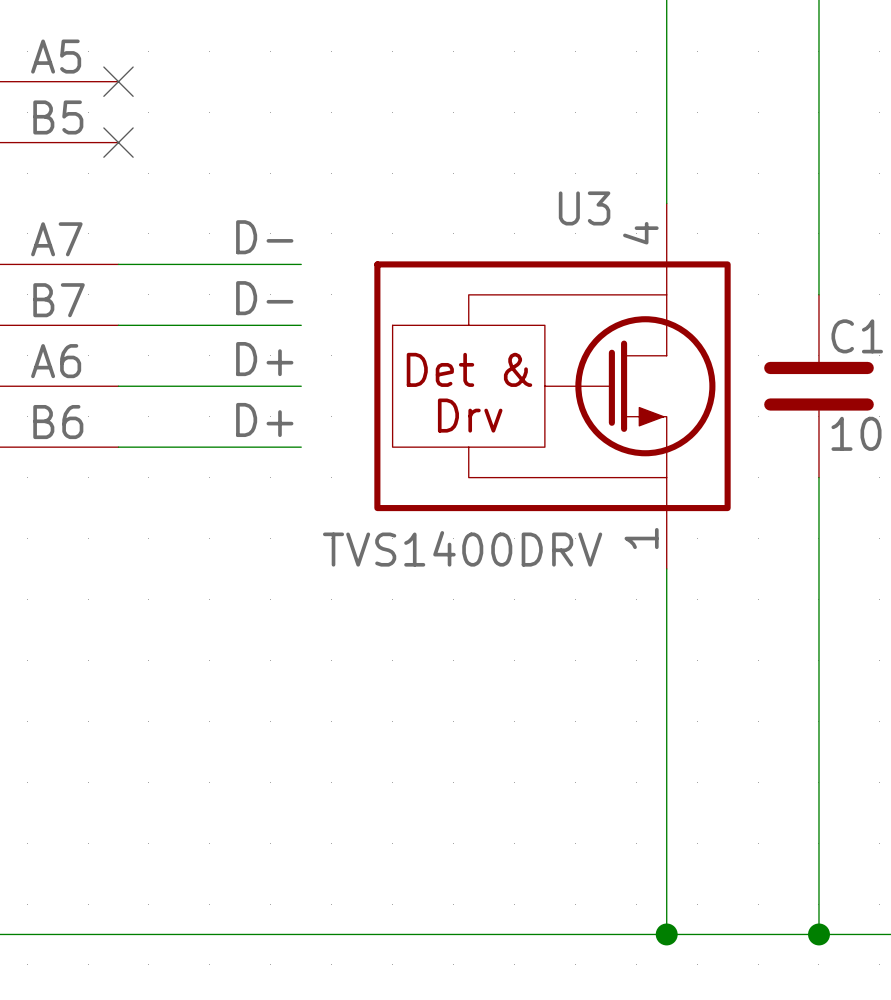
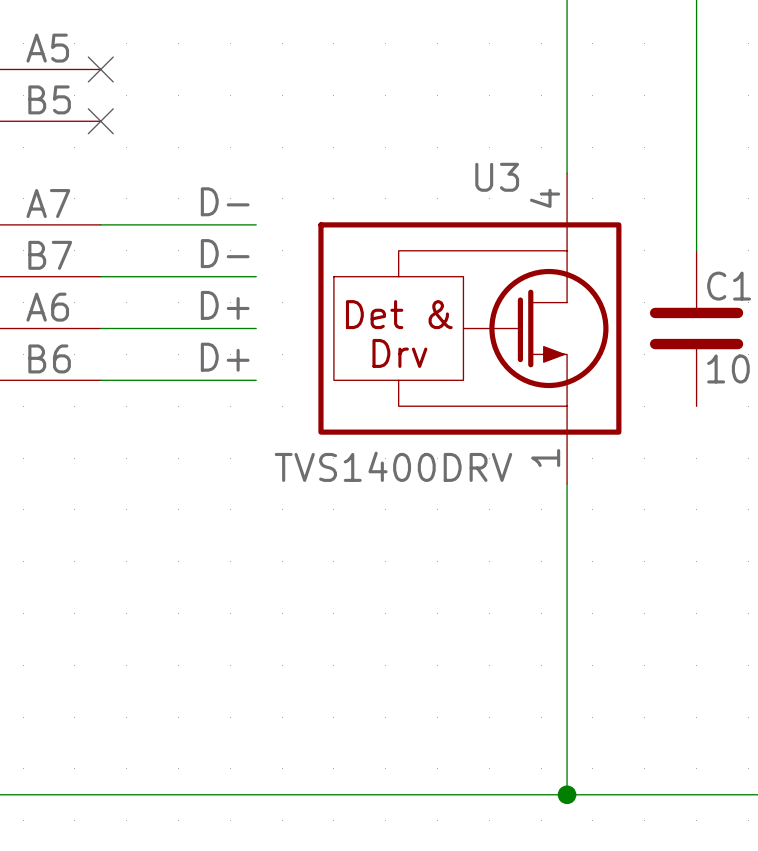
wire: (818, 477) (818, 934) -> none
junction: (818, 934) -> none

